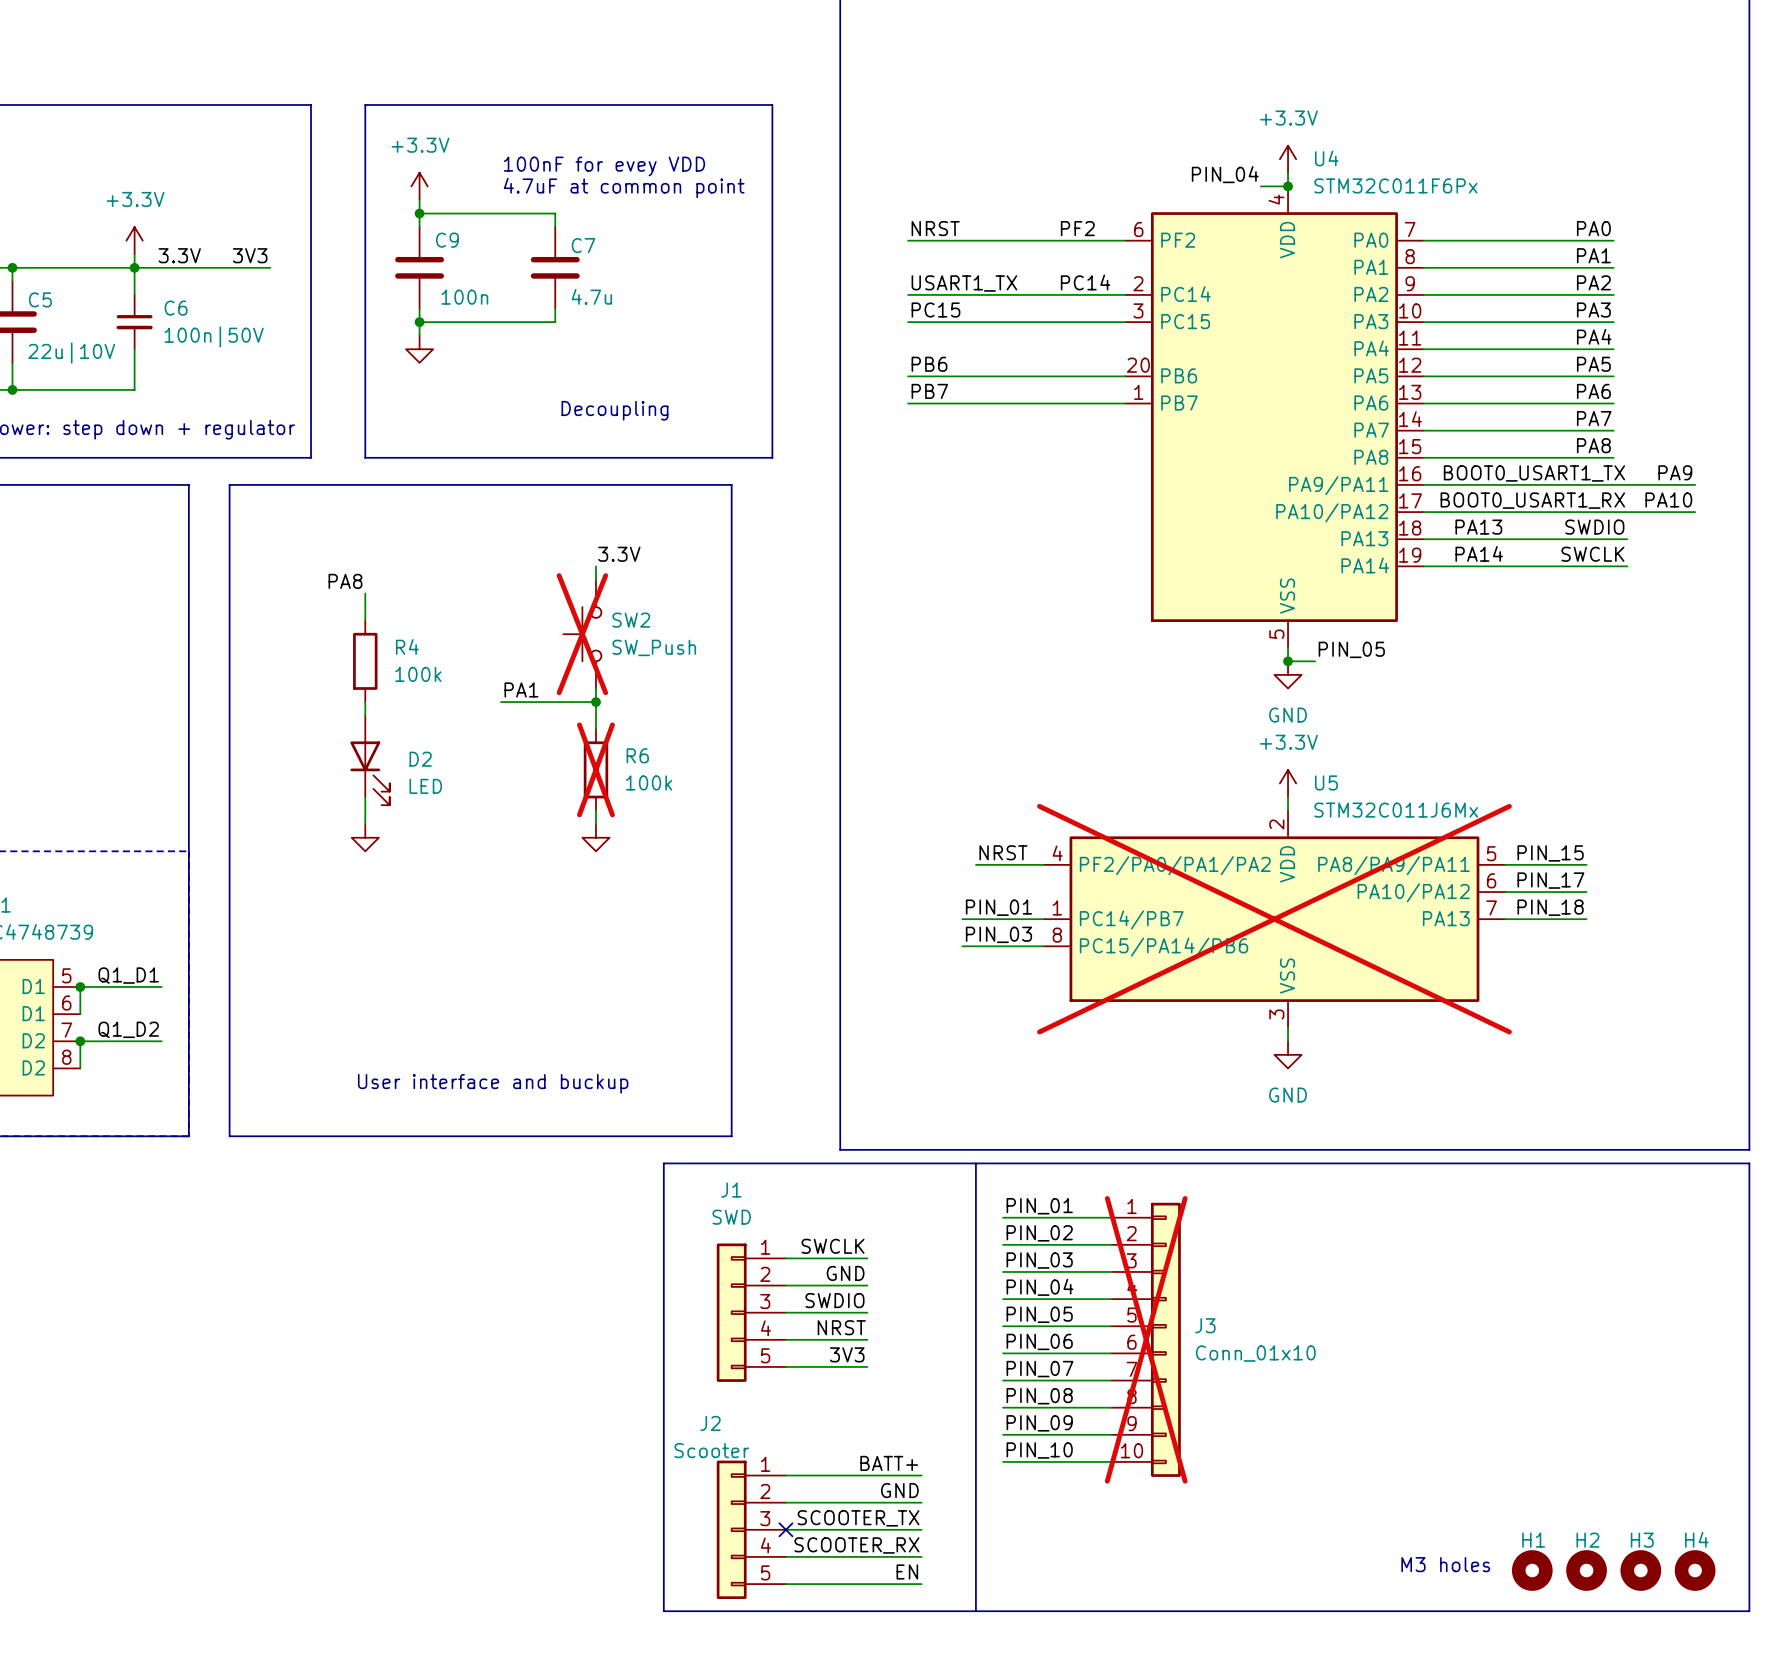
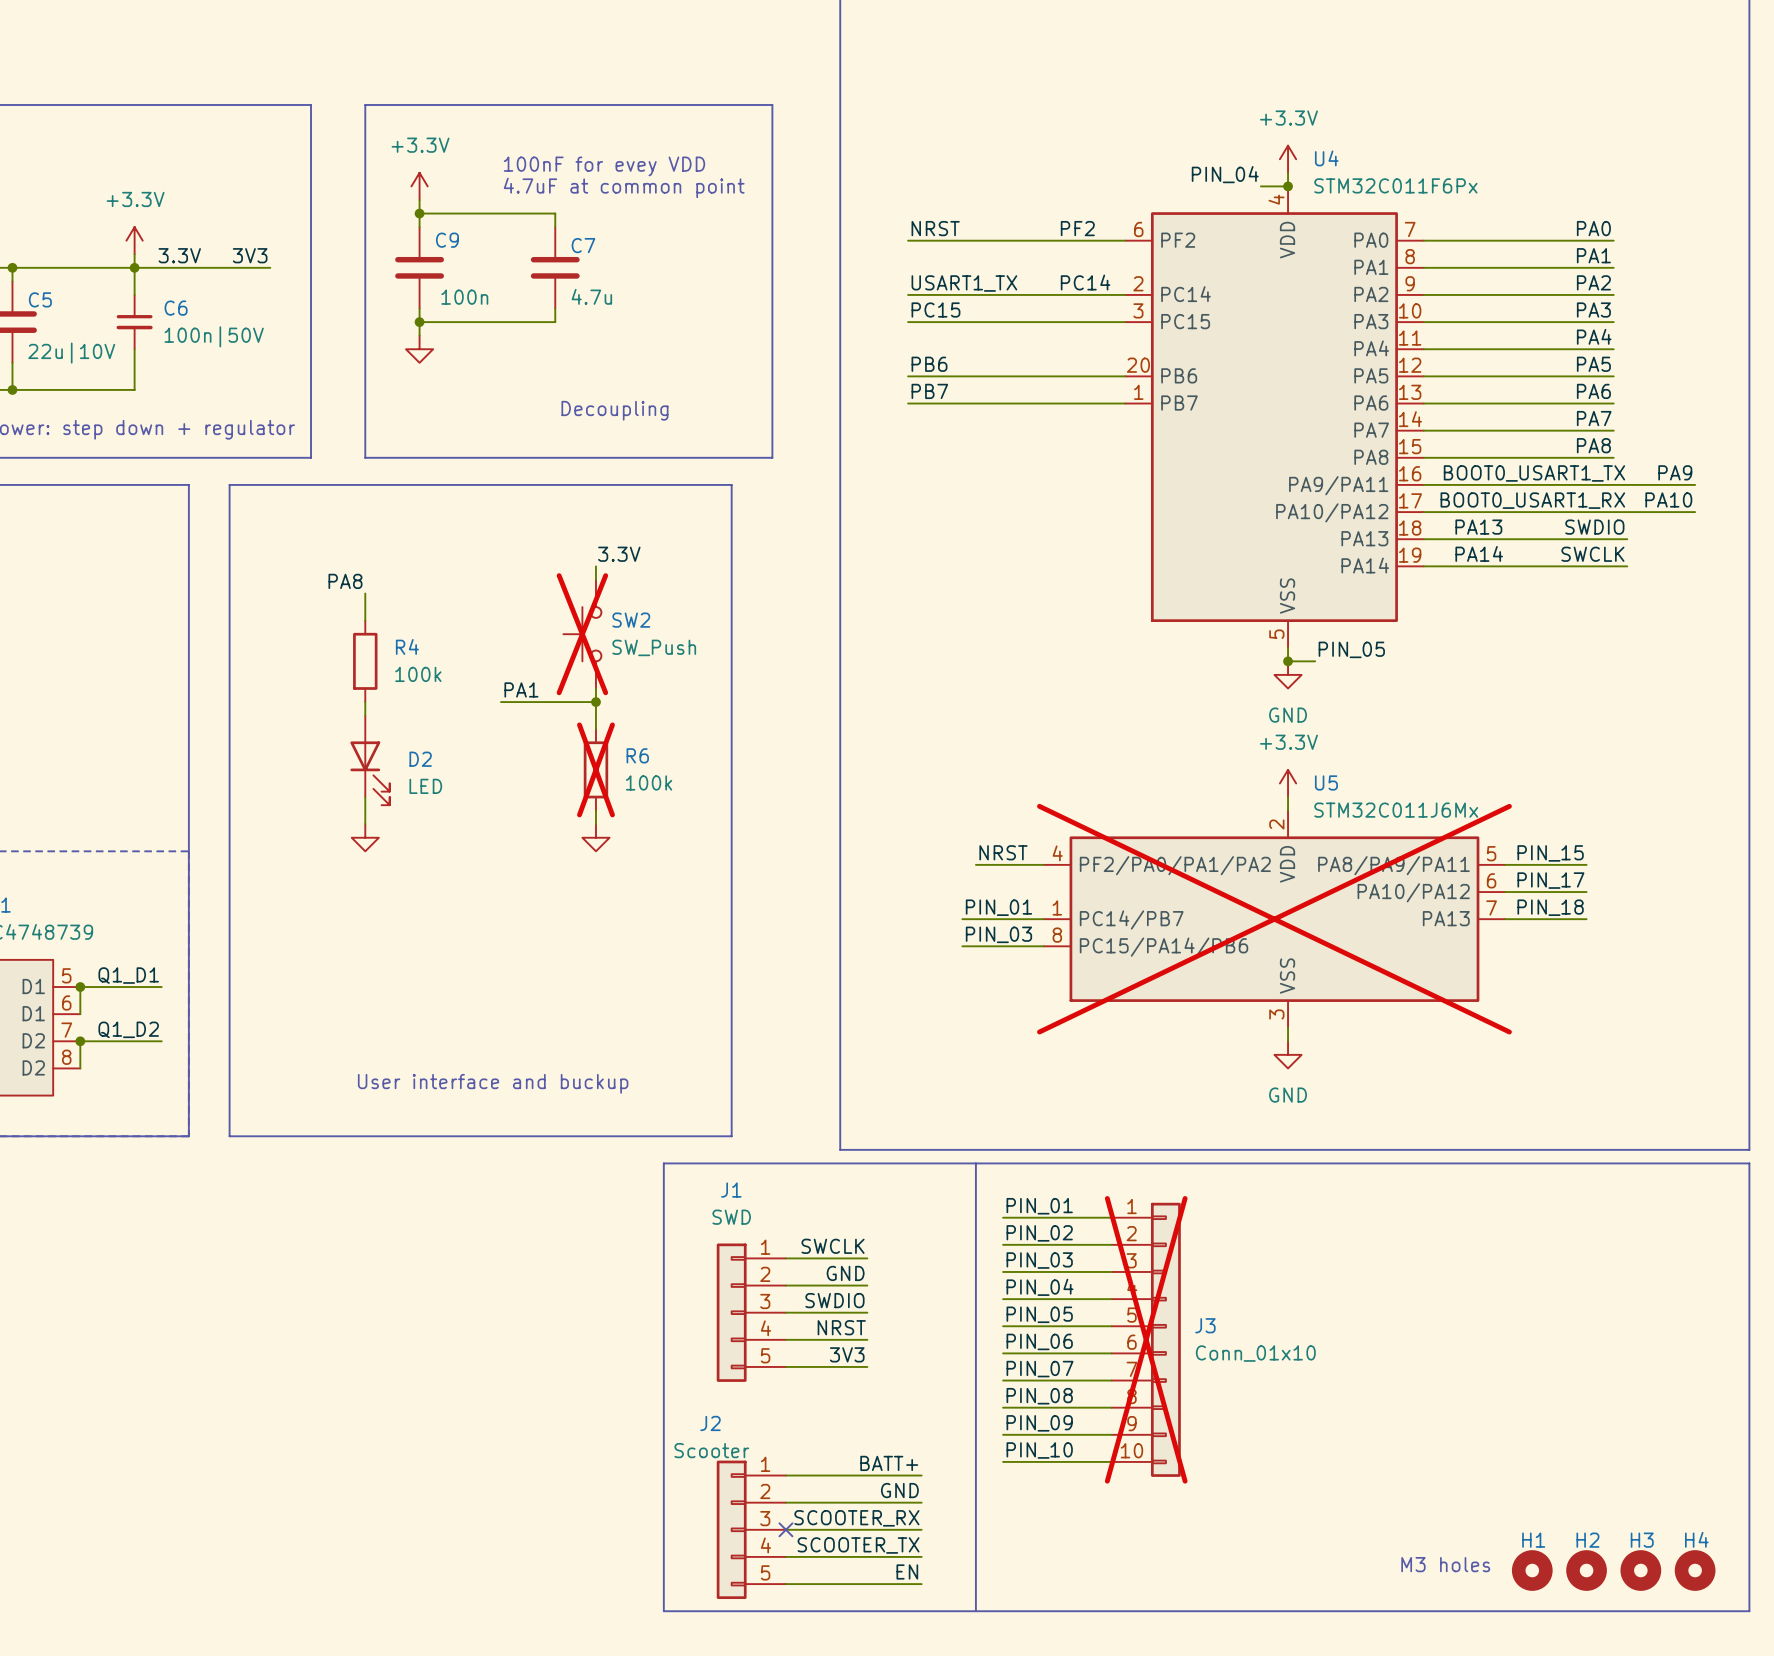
label: SCOOTER_TX (858, 1518) -> SCOOTER_RX (856, 1518)
label: SCOOTER_RX (856, 1545) -> SCOOTER_TX (858, 1545)

